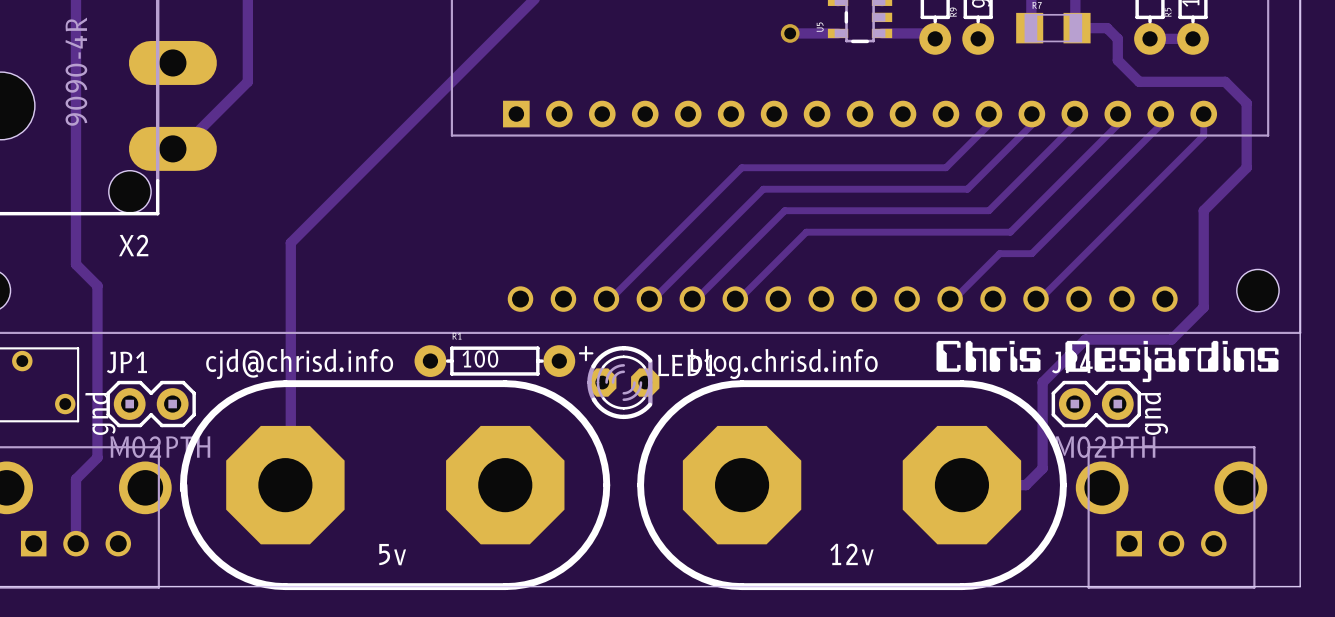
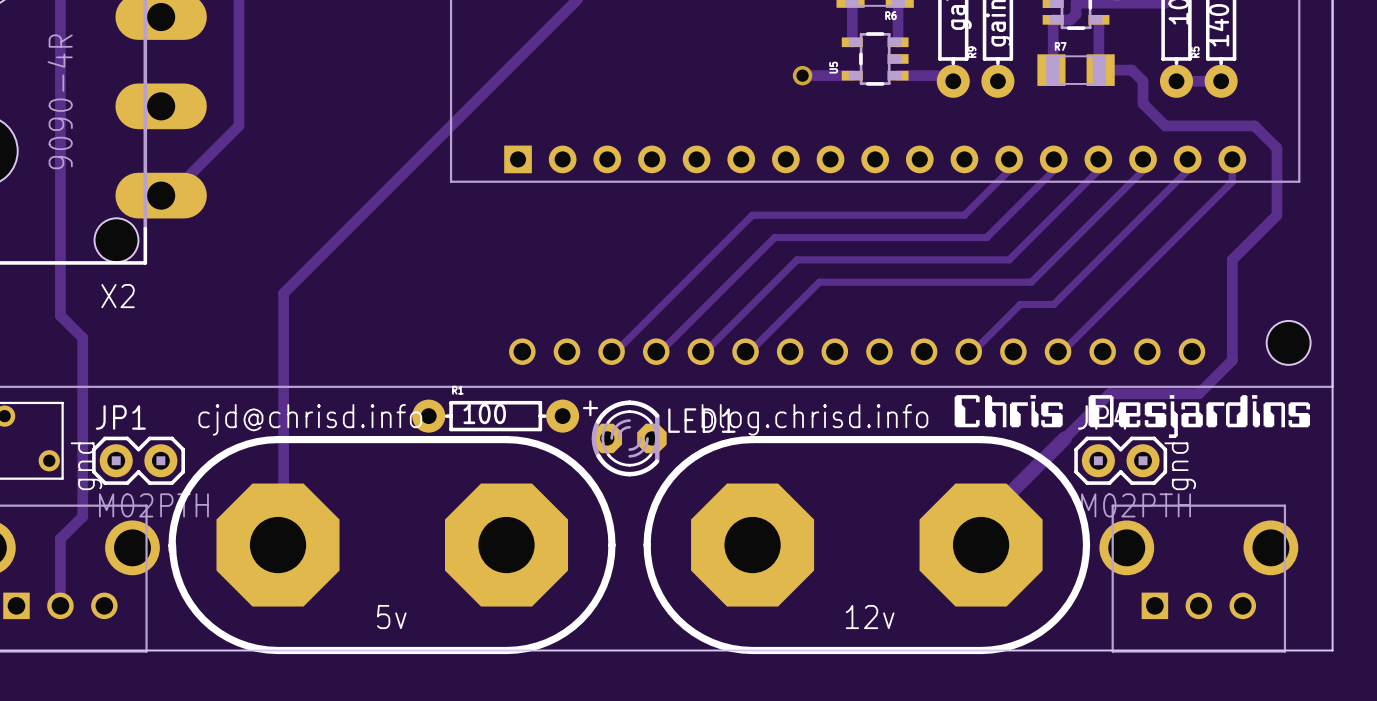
track: (1042, 382) (1042, 468) (1025, 485) (961, 485) -> (1064, 438) (986, 516) (986, 539) (981, 545)

